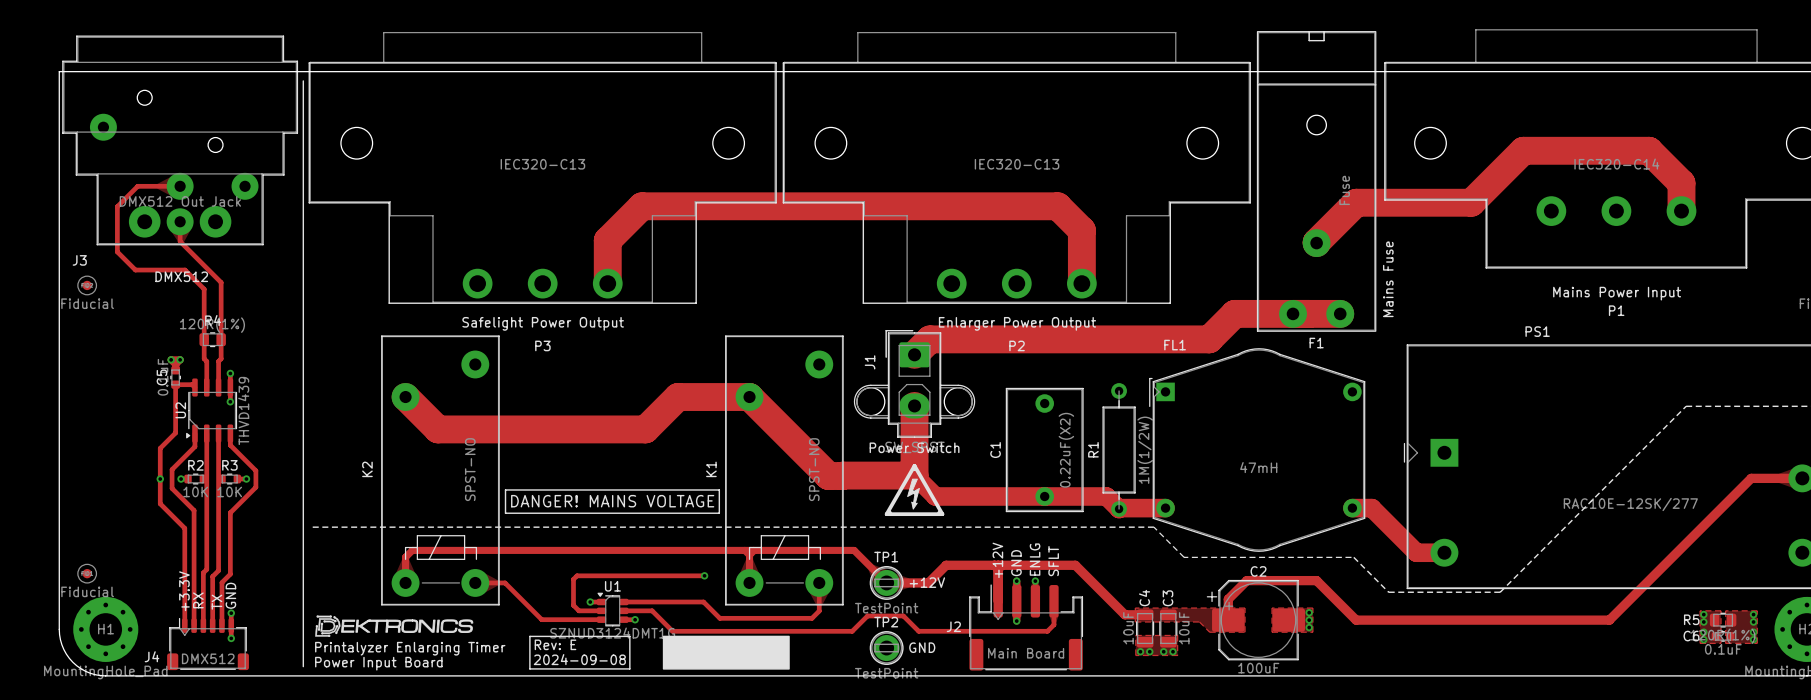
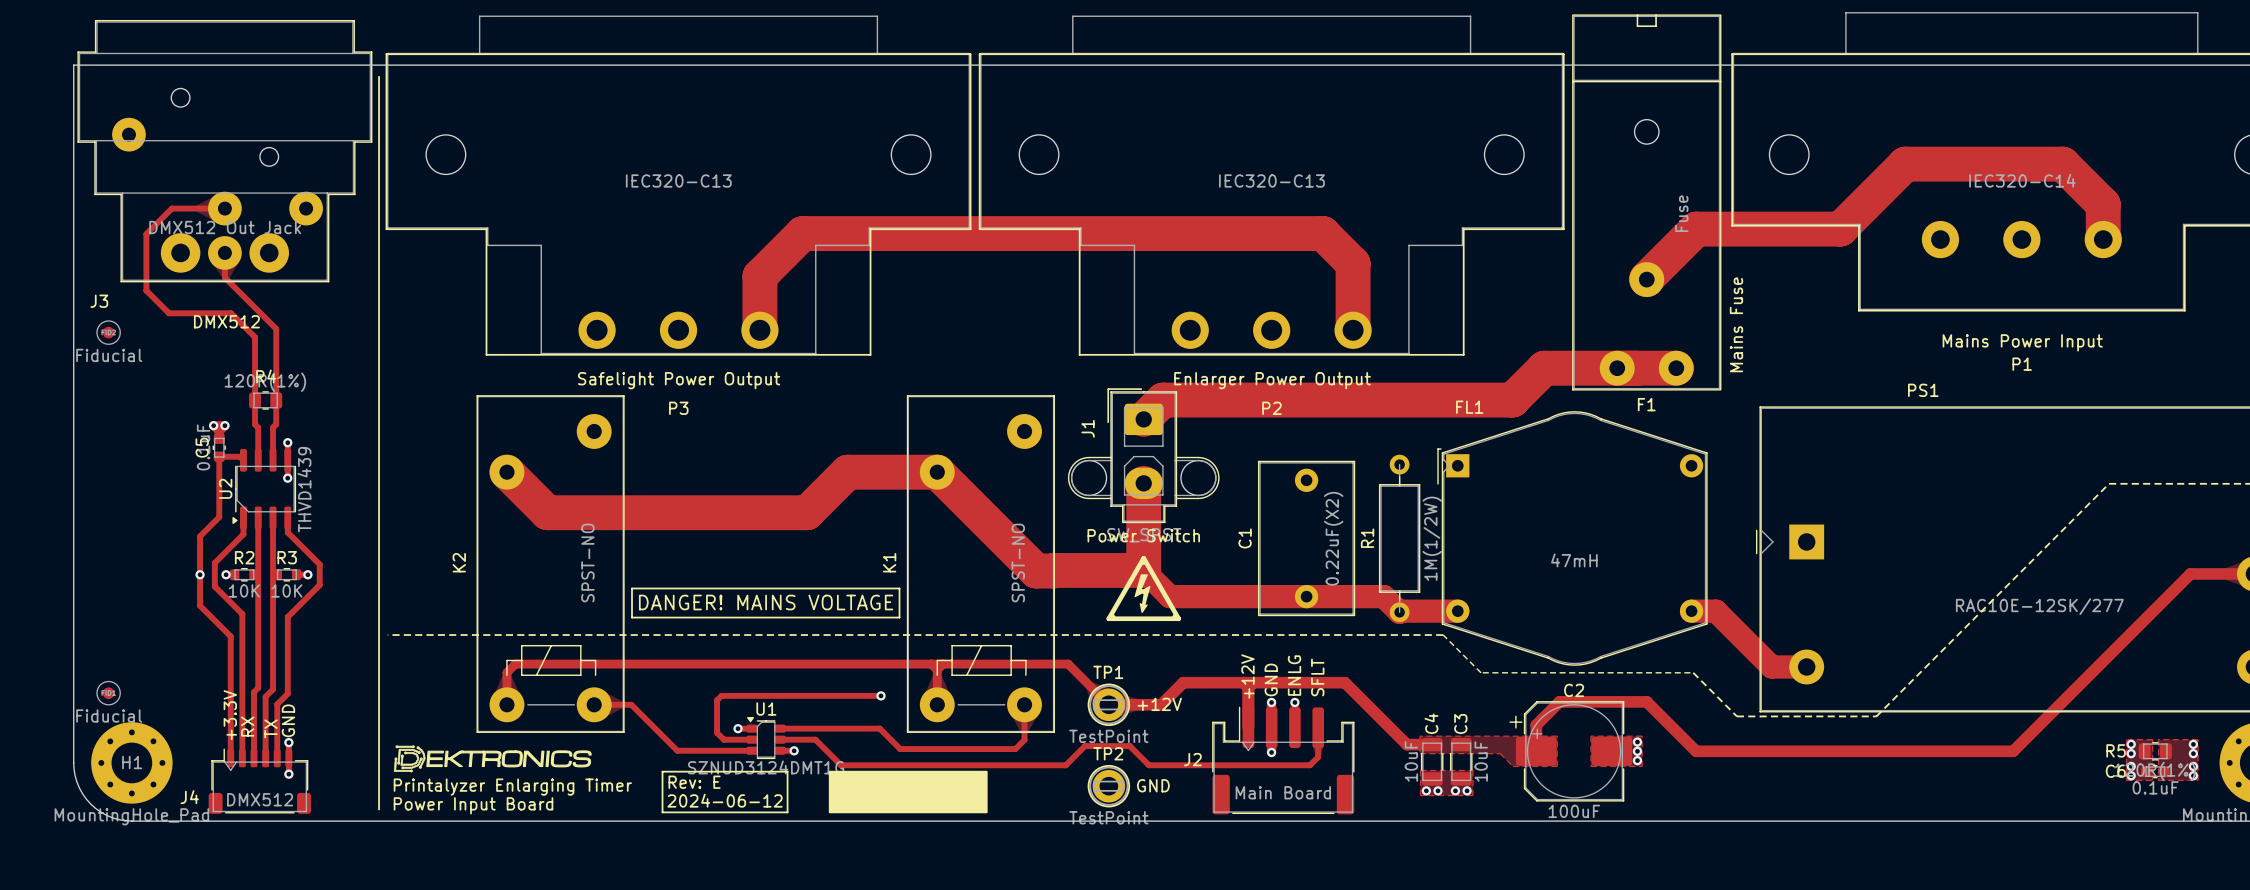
text: 2024-09-08 (579, 659) -> 2024-06-12 (725, 800)

